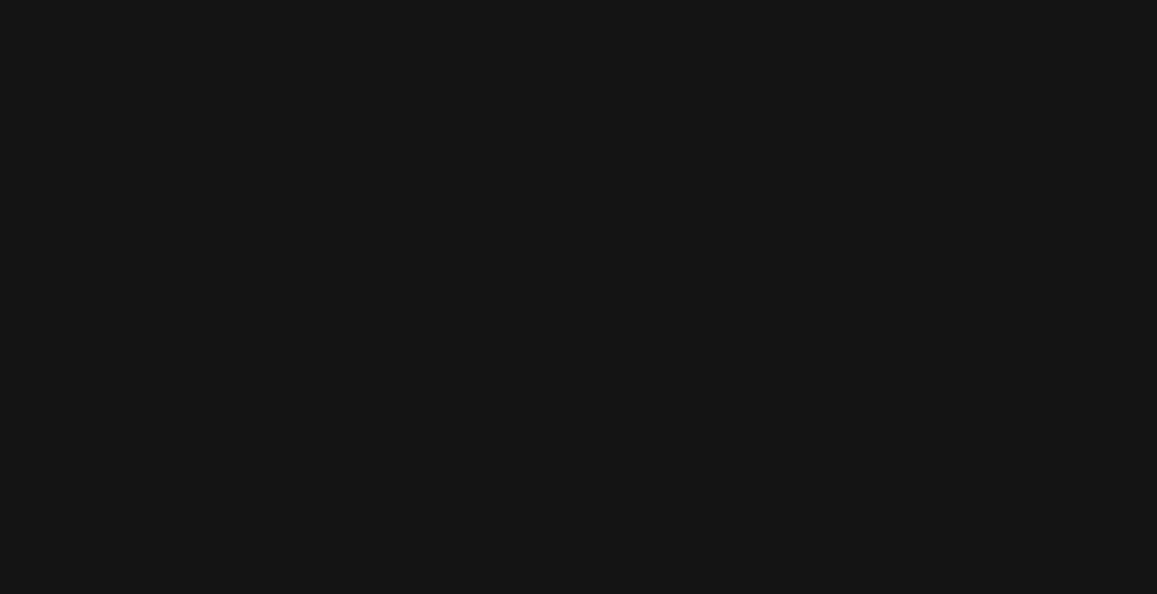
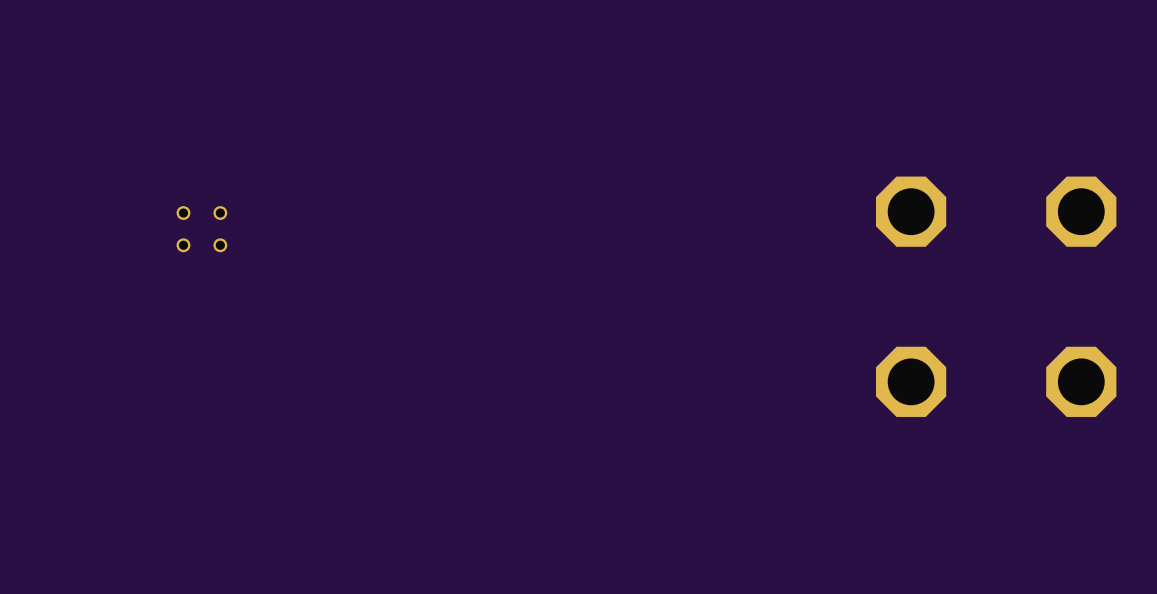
part: none -> (911, 211)
part: none -> (1081, 211)
part: none -> (201, 229)
part: none -> (911, 381)
part: none -> (1081, 381)

